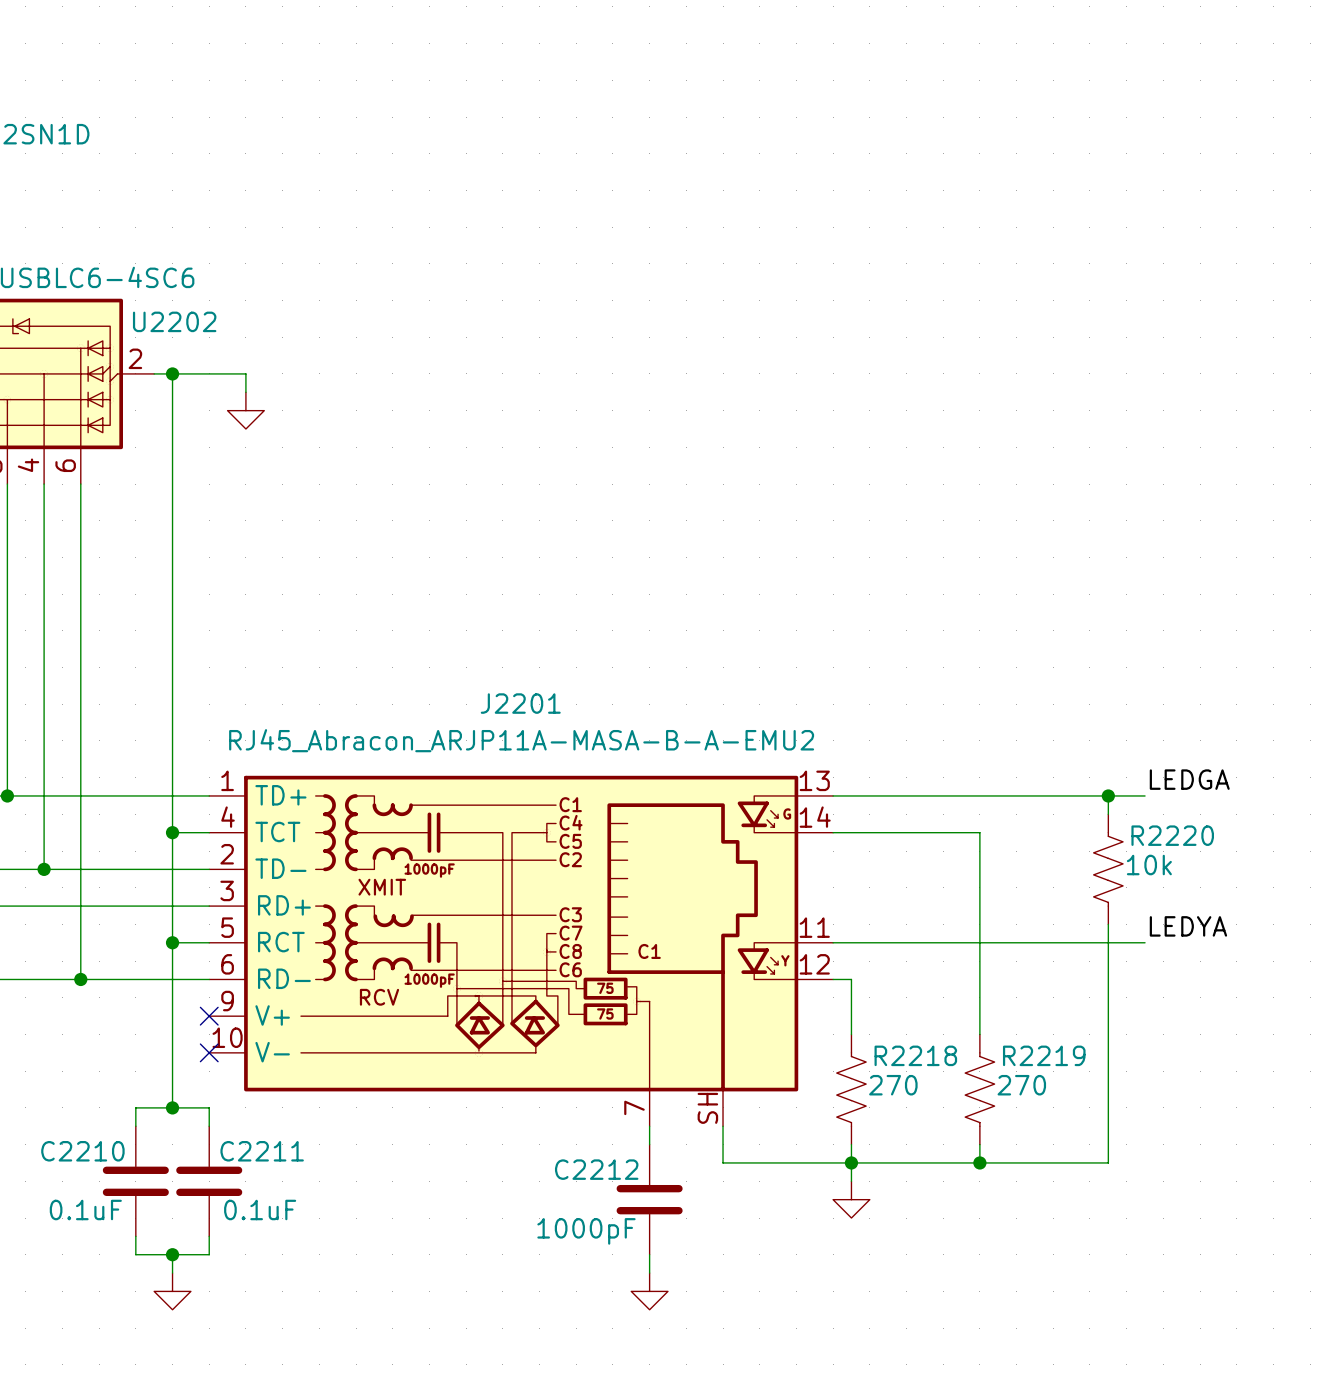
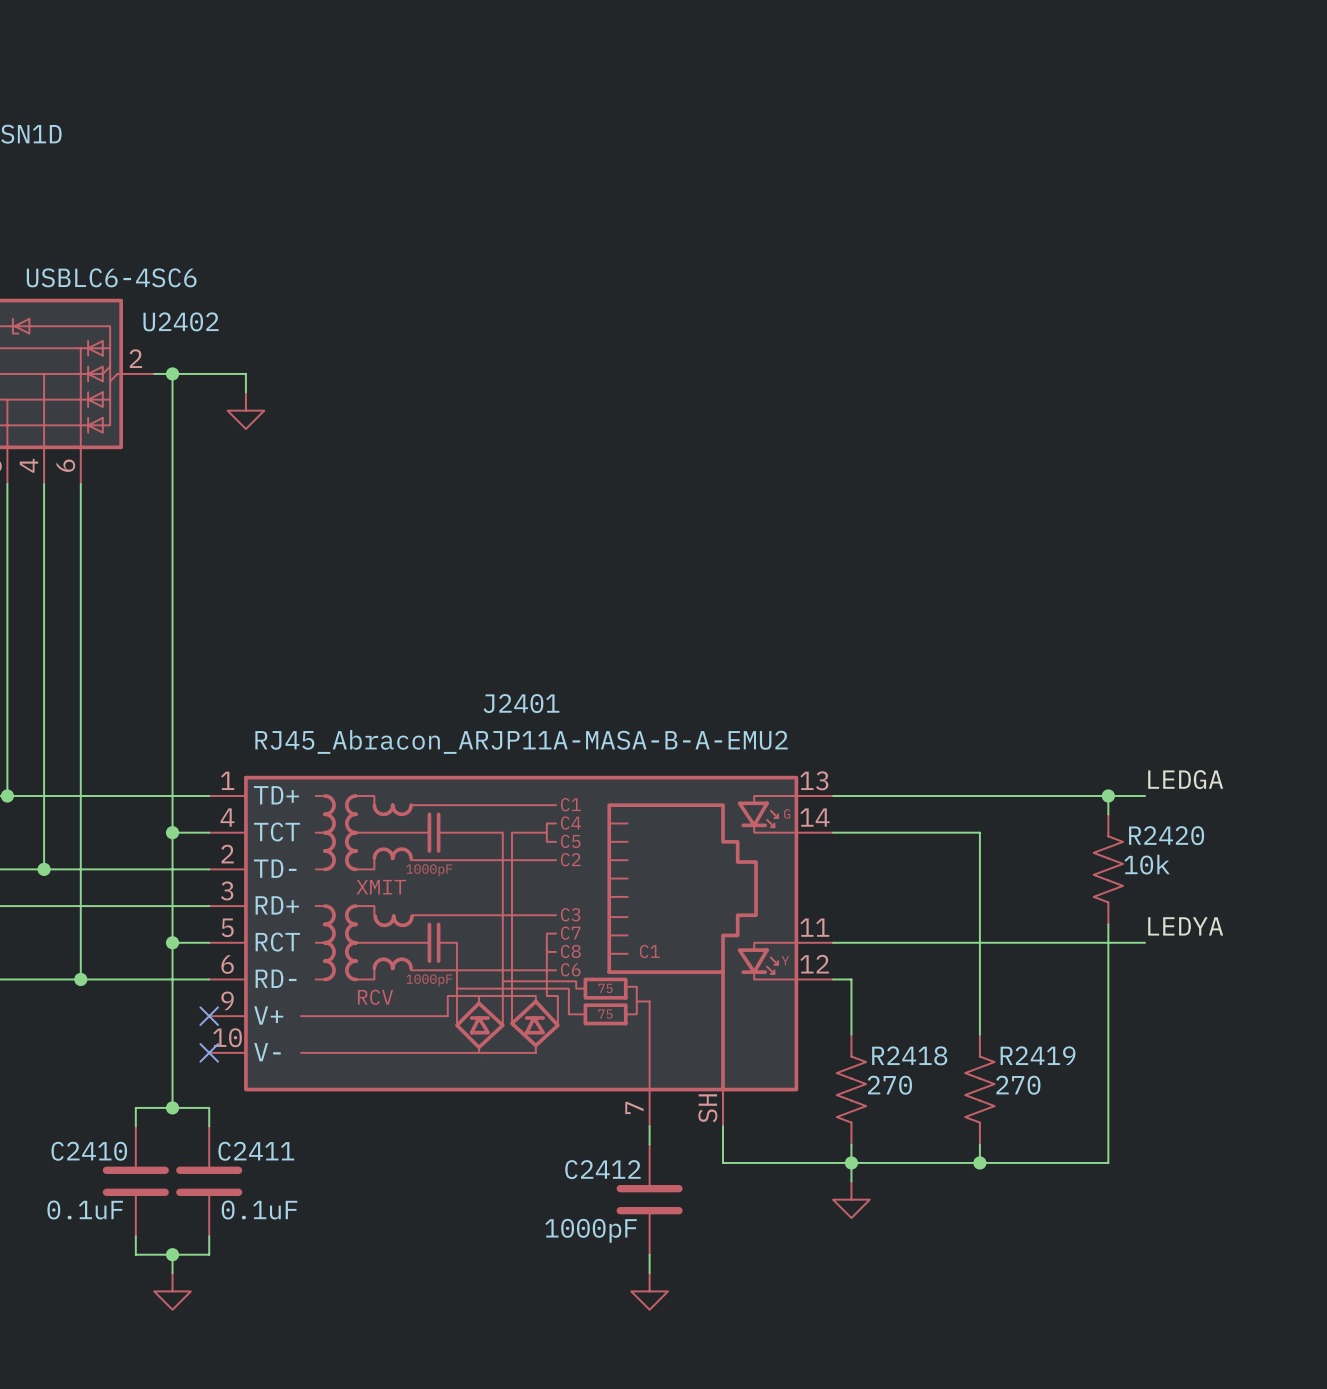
U2202 name: U2202 (174, 321) -> U2402 (181, 321)
J2201 name: J2201 (520, 703) -> J2401 (521, 703)
R2220 name: R2220 (1172, 835) -> R2420 (1166, 835)
R2218 name: R2218 (915, 1055) -> R2418 (909, 1055)
R2219 name: R2219 (1044, 1055) -> R2419 (1038, 1055)
C2210 name: C2210 (82, 1151) -> C2410 (89, 1151)
C2211 name: C2211 (262, 1151) -> C2411 (256, 1151)
C2212 name: C2212 (596, 1169) -> C2412 (602, 1169)

